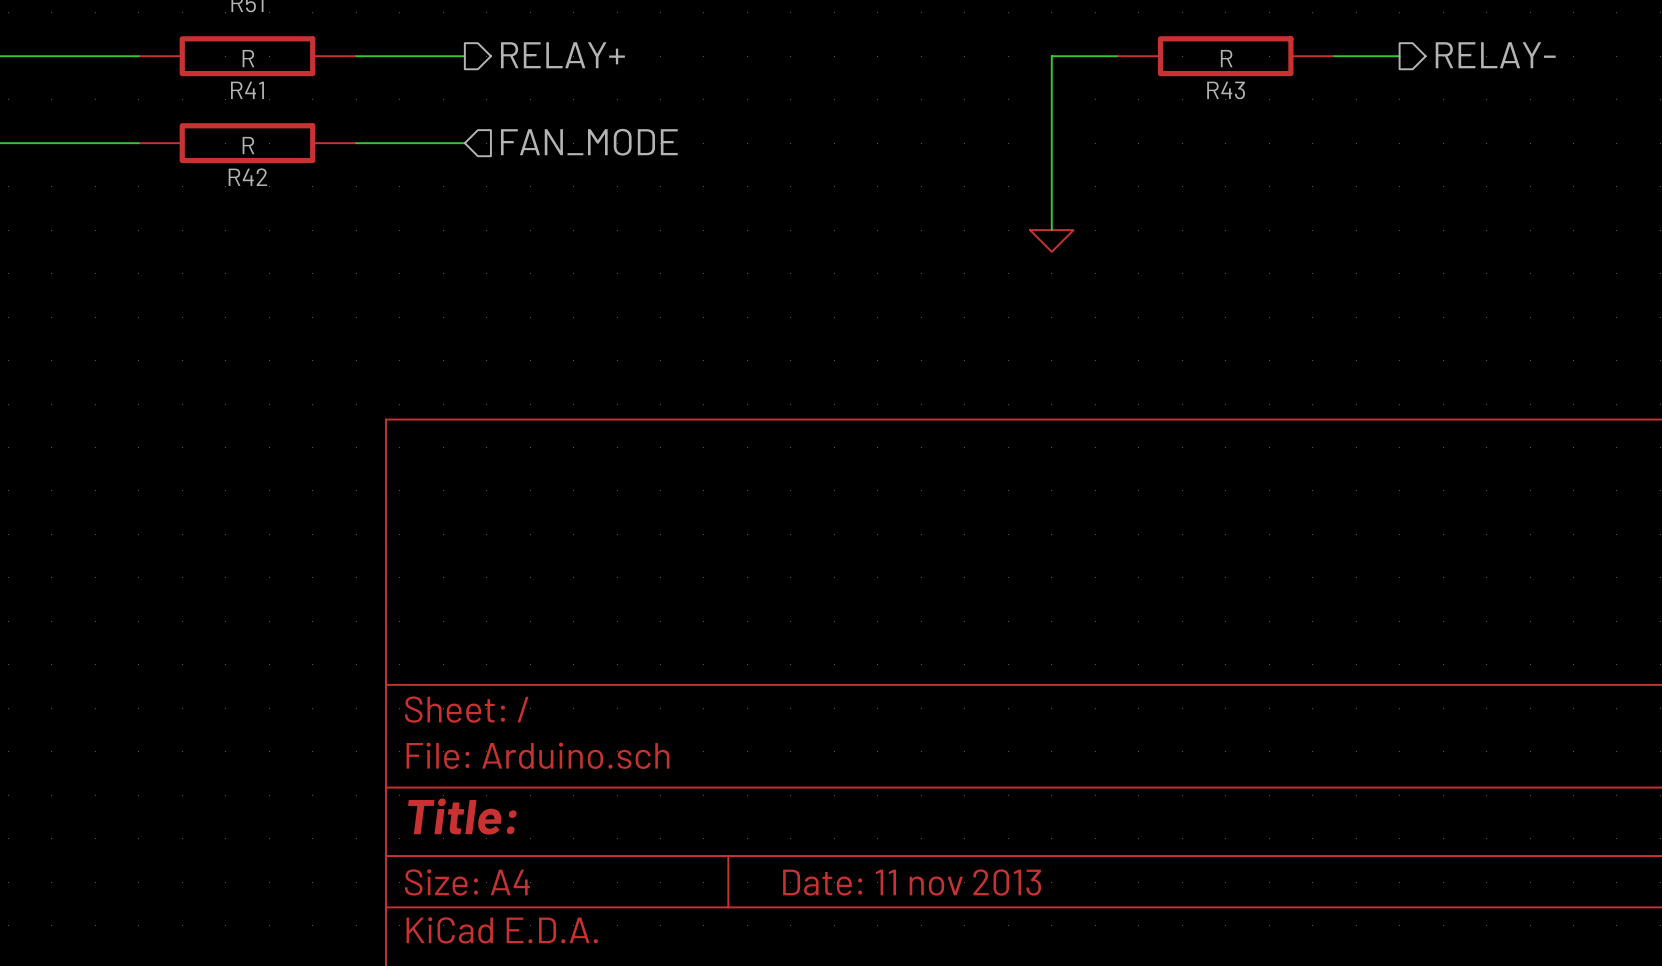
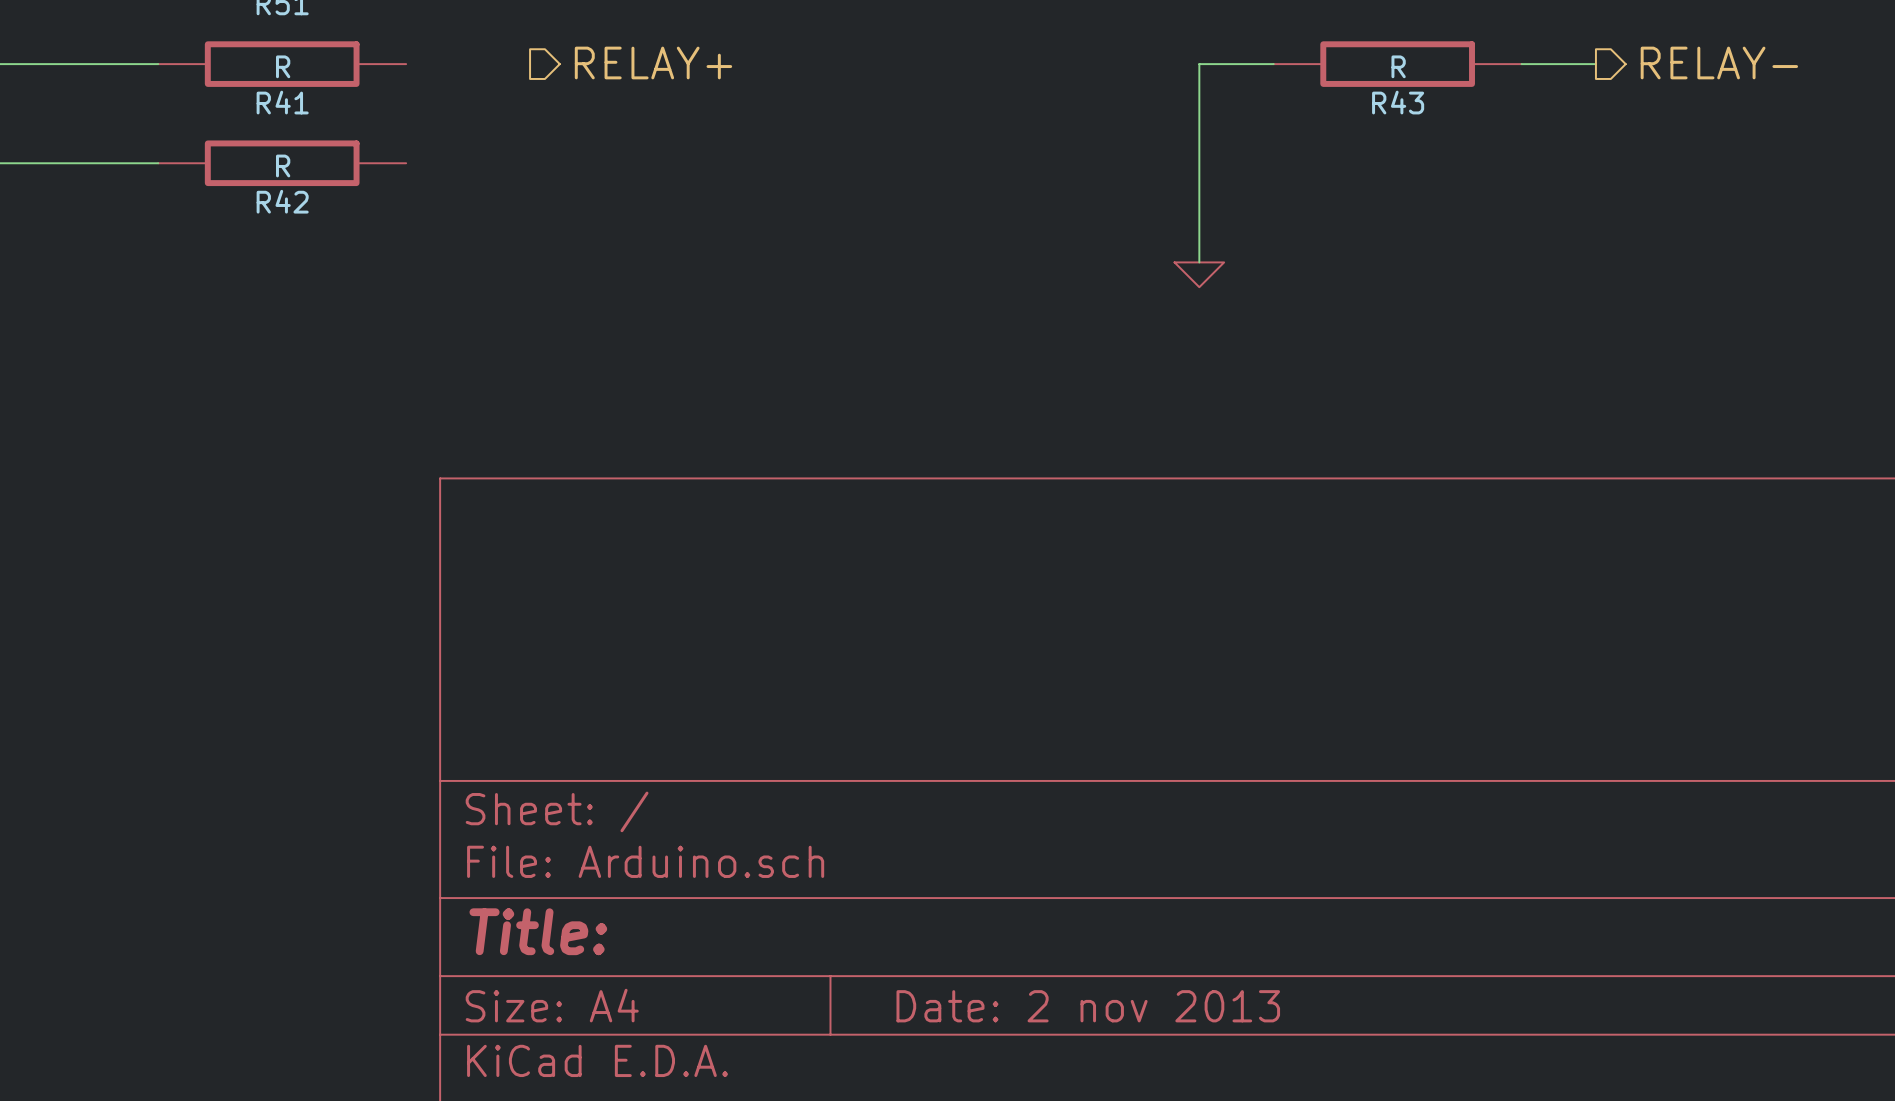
wire: (356, 56) (464, 56) -> none
hierarchical label: FAN_MODE (589, 142) -> none
wire: (356, 143) (464, 143) -> none
title block: Date: 11 nov 2013 (912, 882) -> Date: 2 nov 2013 (1088, 1006)

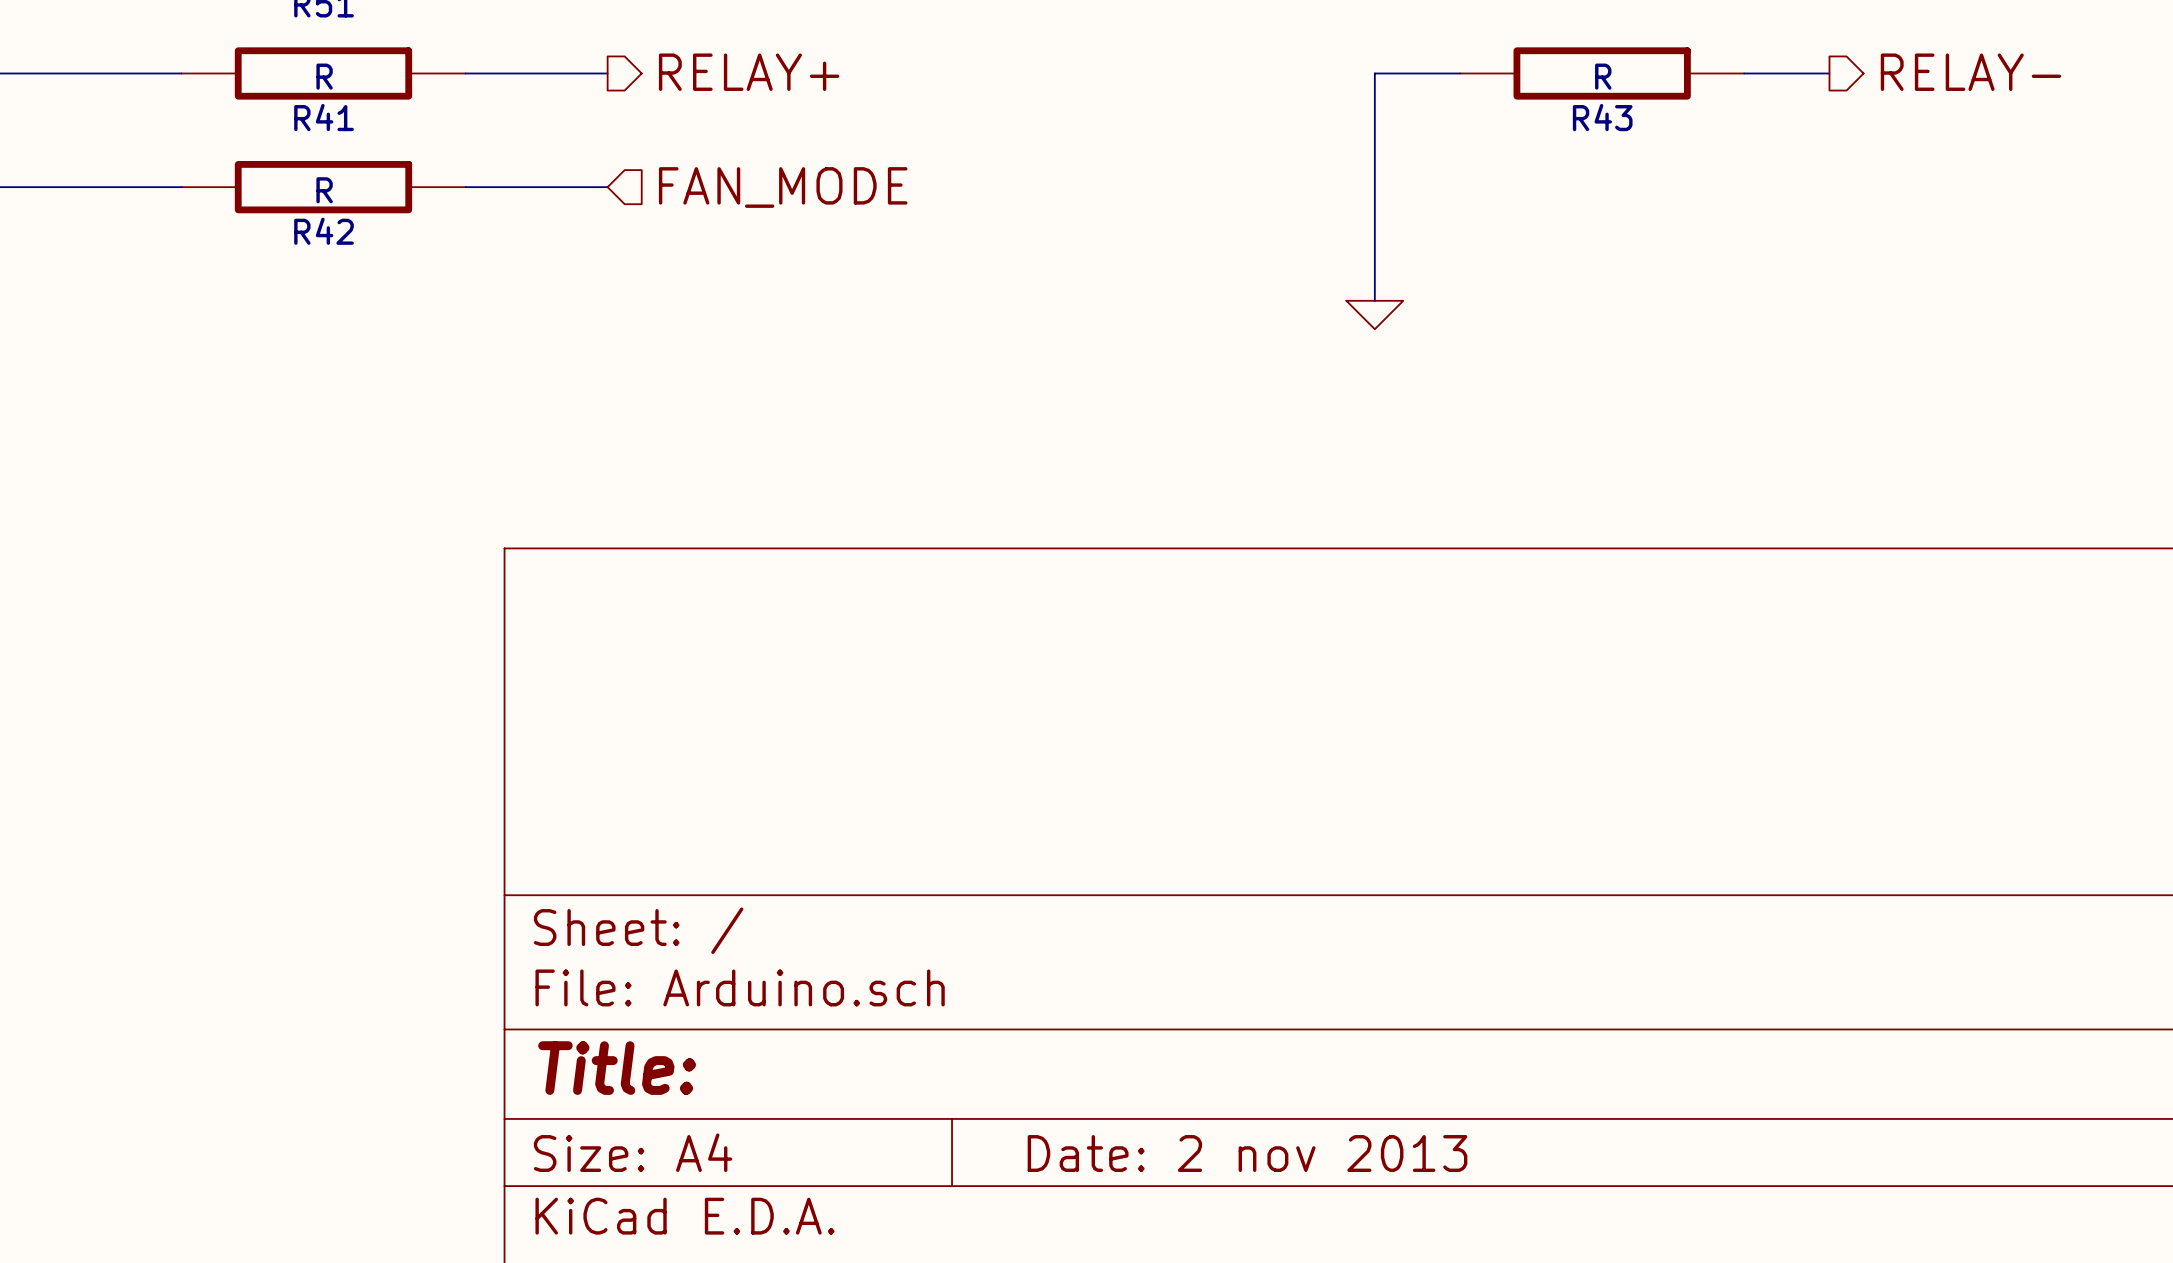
wire: none -> (465, 73) (607, 73)
wire: none -> (465, 187) (607, 187)
hierarchical label: none -> FAN_MODE (783, 187)

